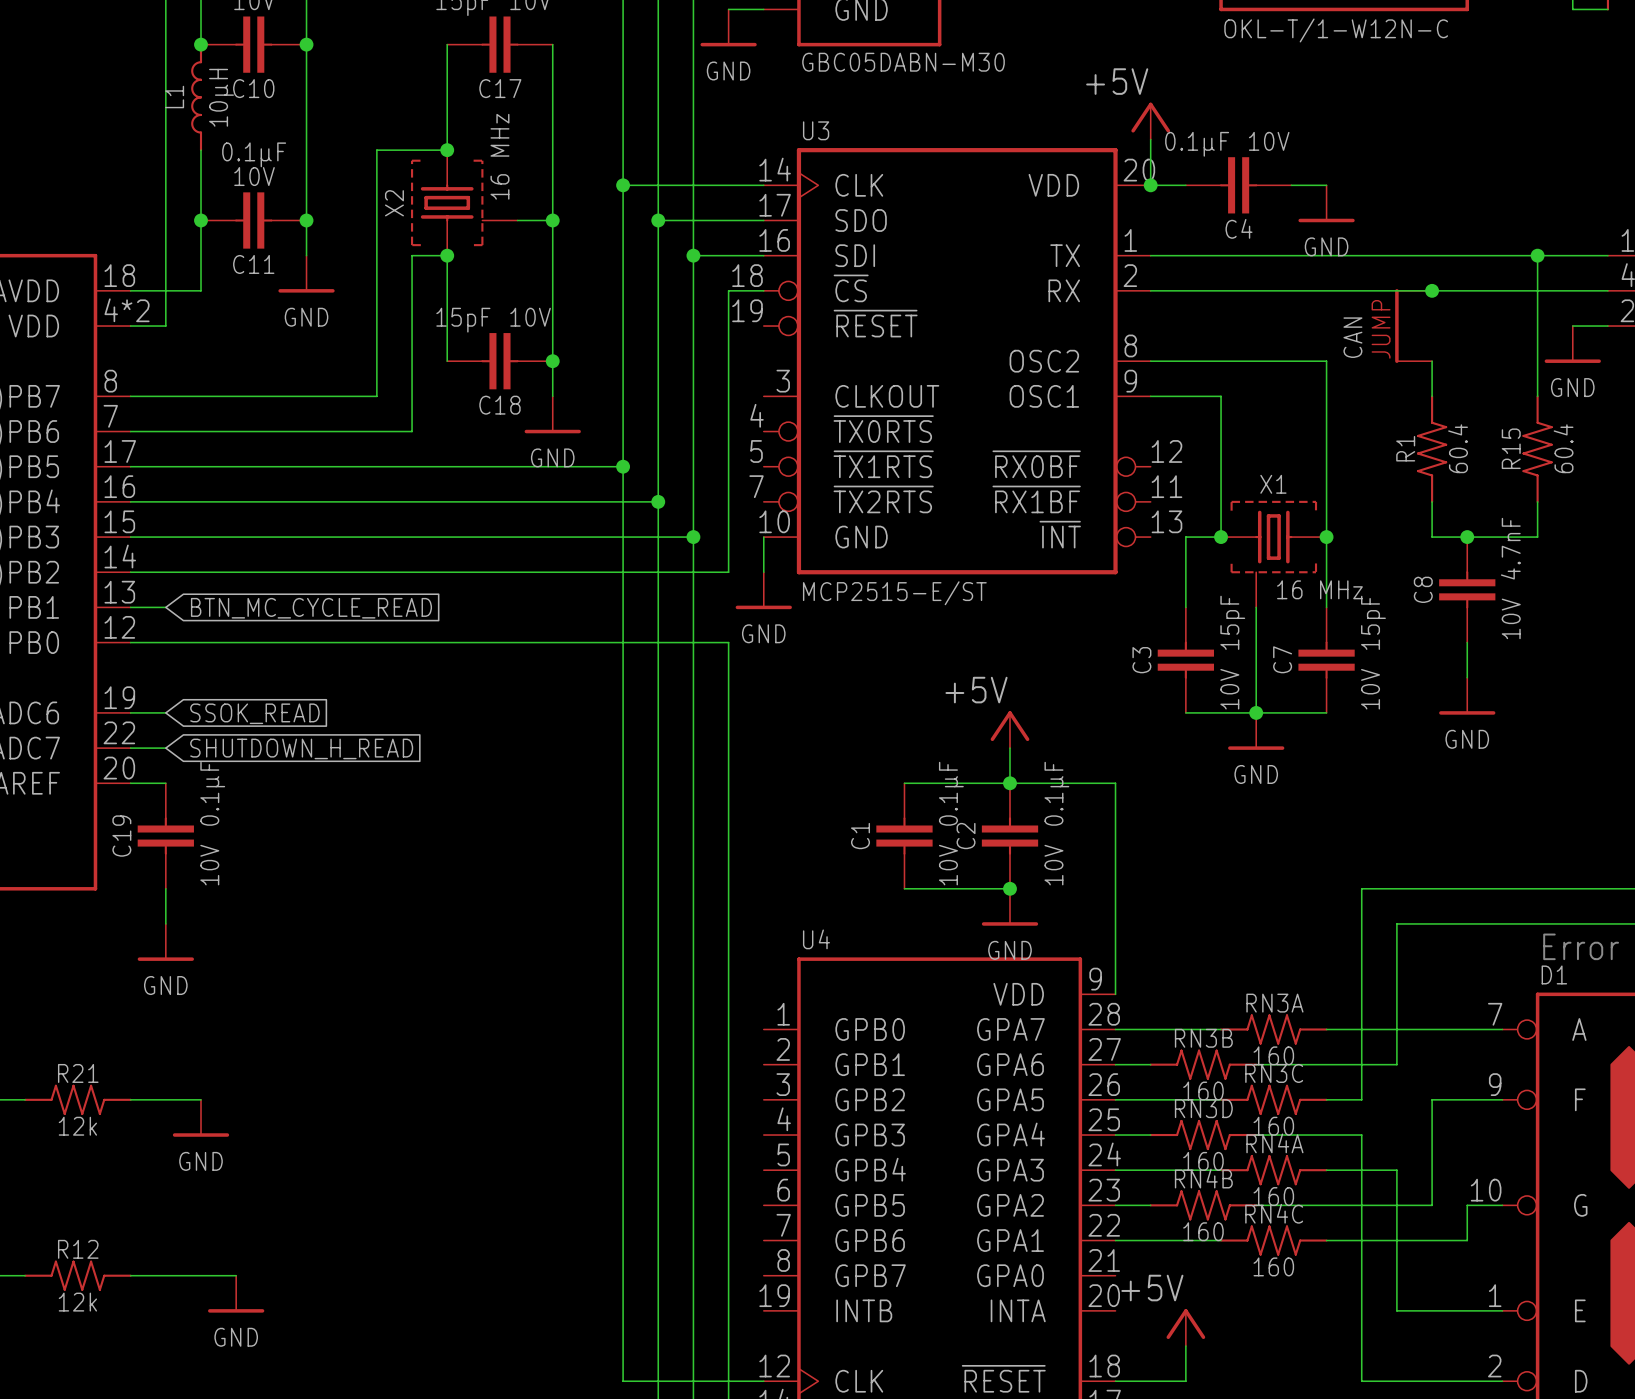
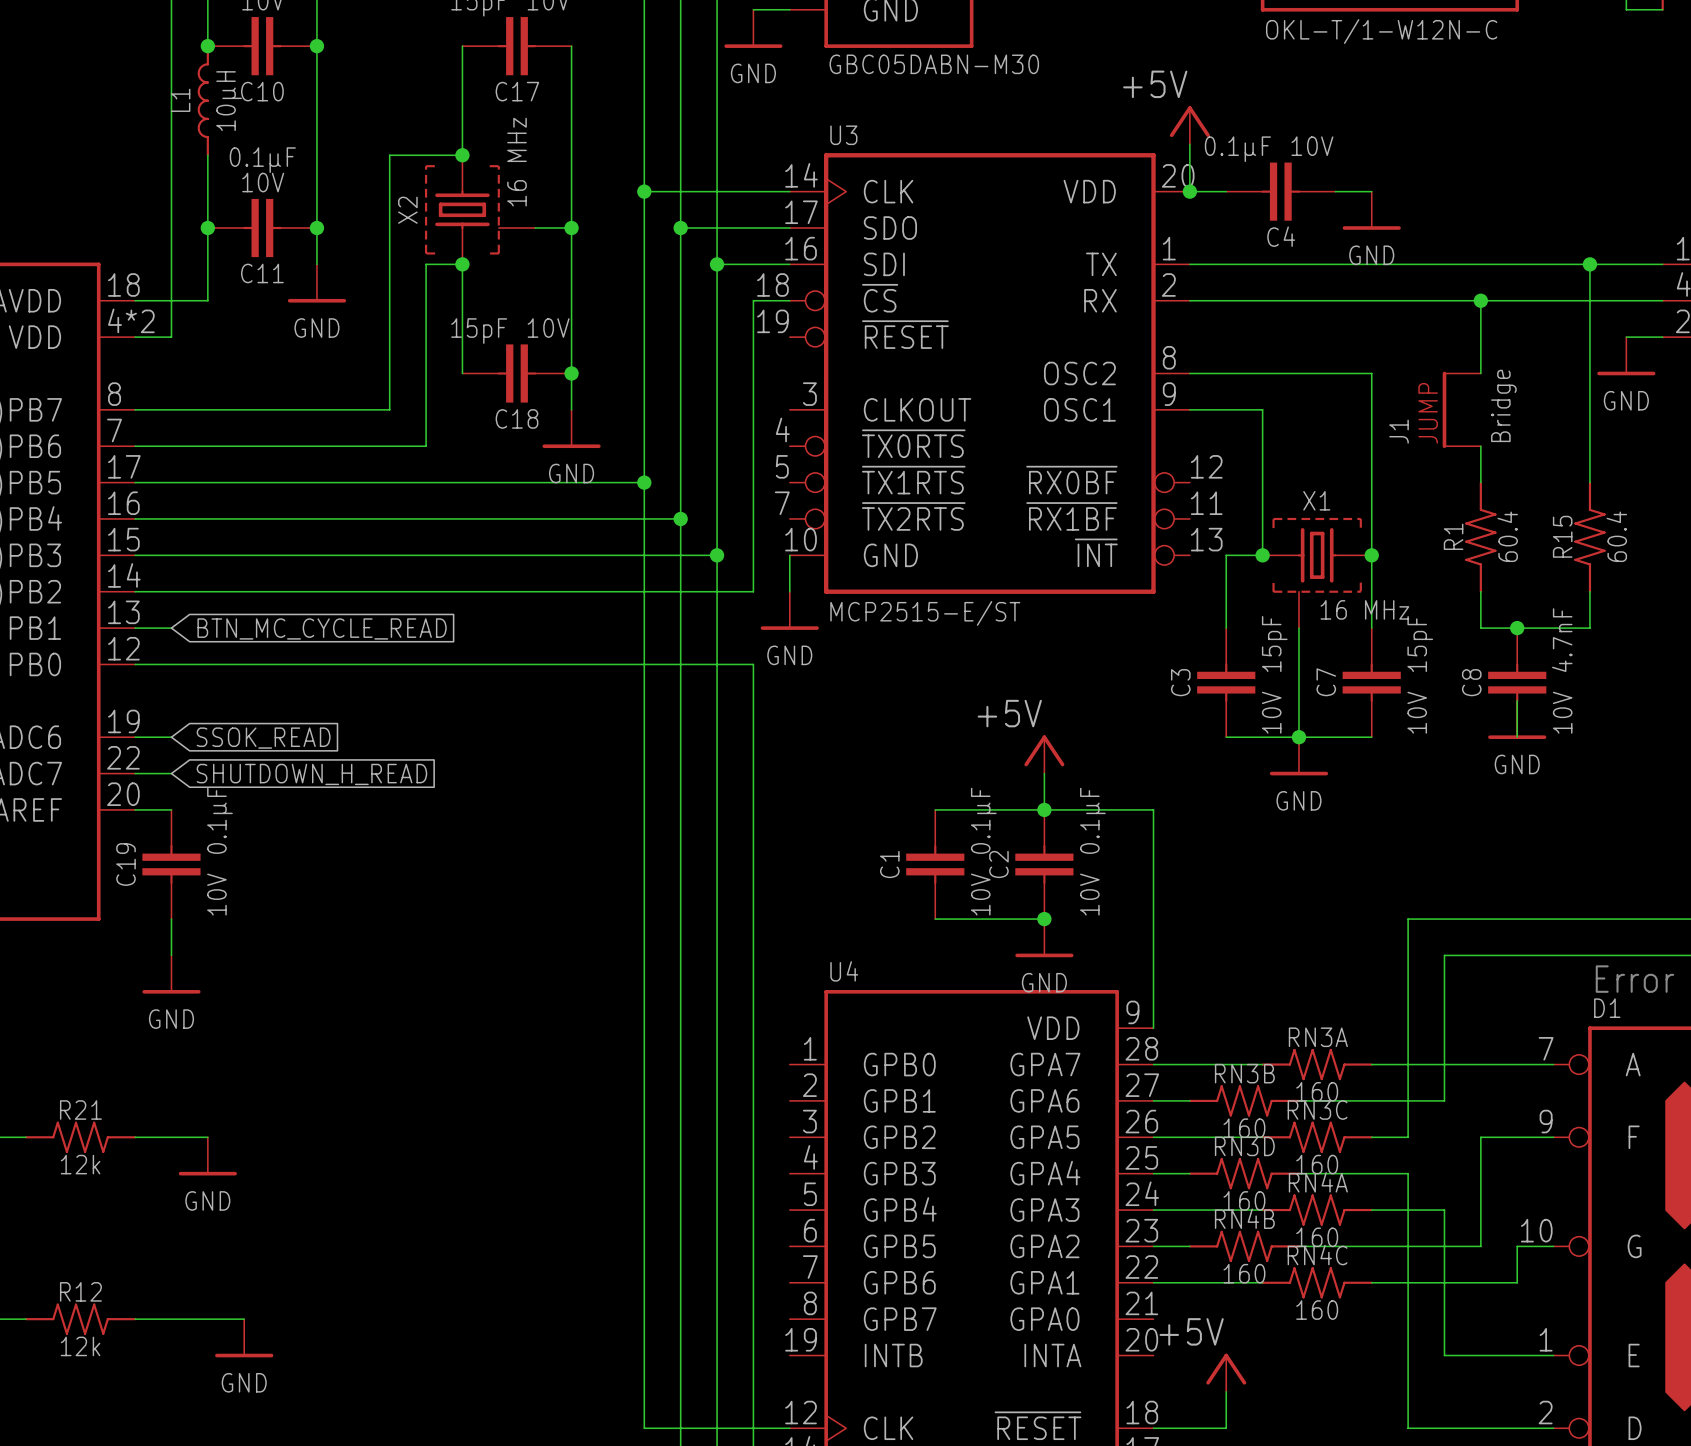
CAN: (1413, 326) -> none
wire: (1432, 361) (1432, 396) -> (1480, 373) (1480, 300)
J1: none -> (1461, 409)
wire: none -> (1480, 446) (1480, 482)
R1 position: (1432, 449) -> (1480, 537)
R15 position: (1537, 449) -> (1589, 537)
wire: (1432, 501) (1432, 537) (1537, 537) (1537, 501) -> (1480, 591) (1480, 628) (1589, 628) (1589, 591)
junction position: (1467, 537) -> (1517, 628)
C8 position: (1467, 589) -> (1517, 682)

